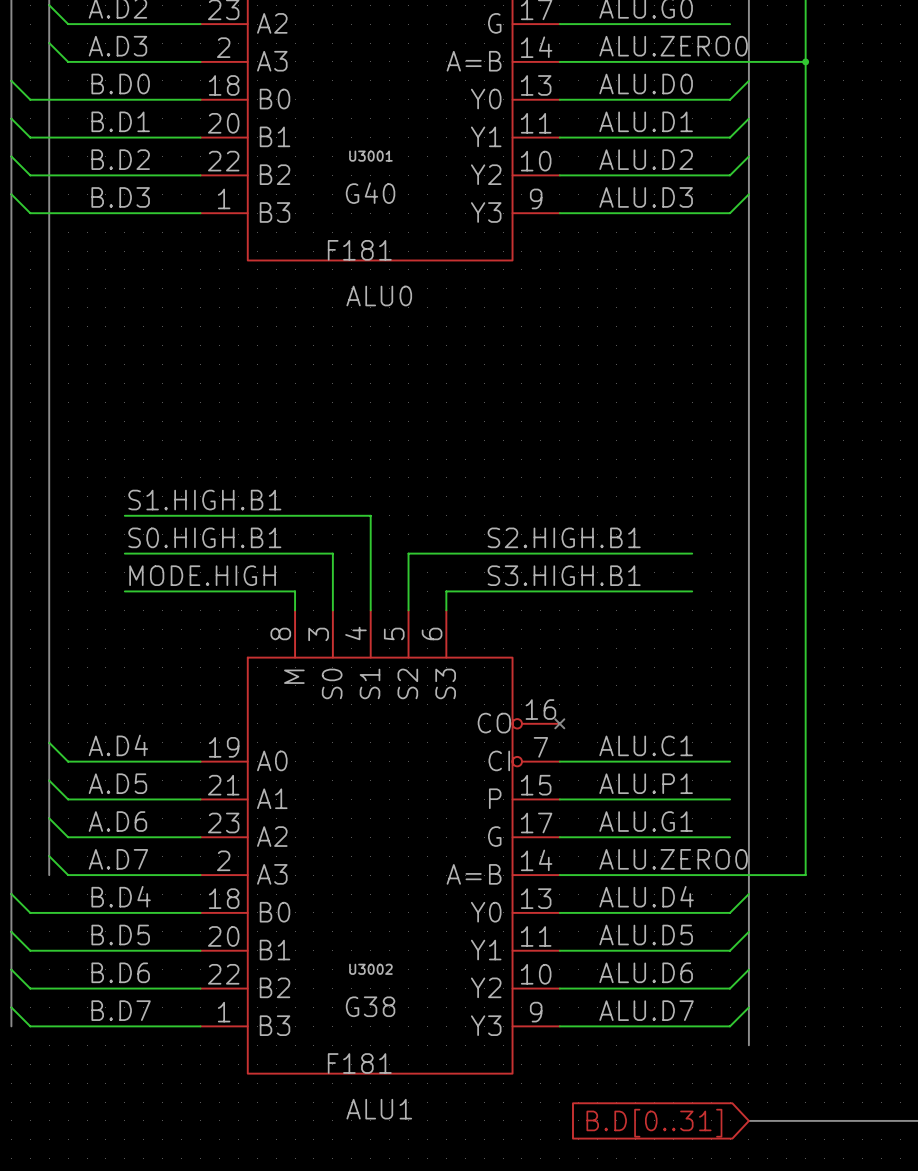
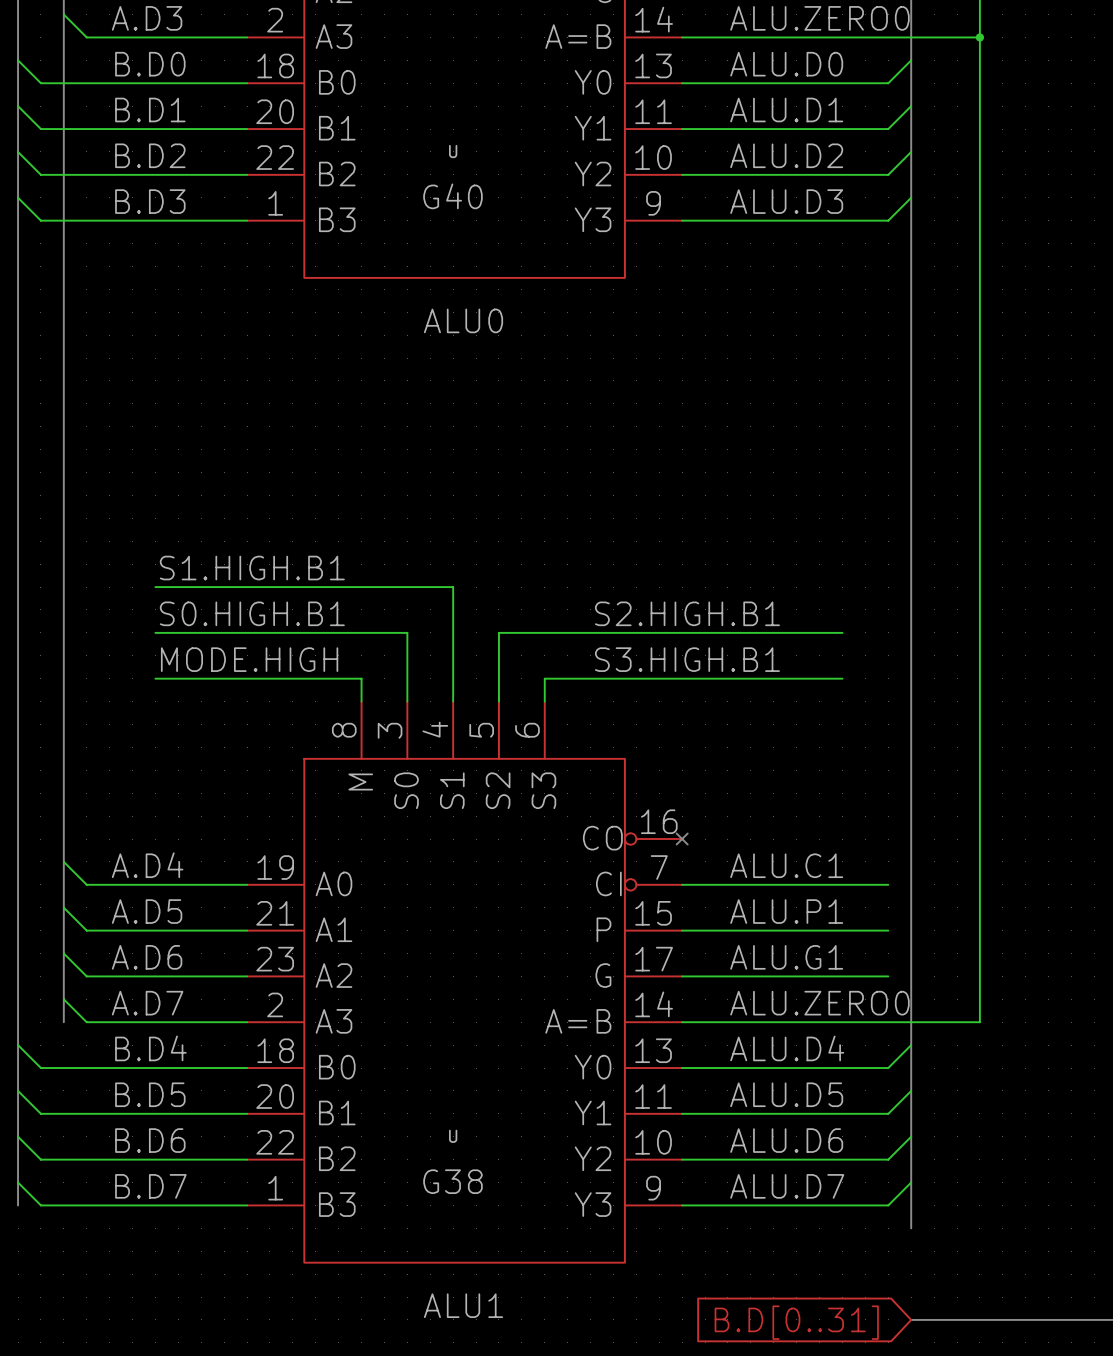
U3001 name: U3001 (370, 156) -> U (453, 151)
U3001 value: F181 (359, 250) -> none
U3002 name: U3002 (370, 969) -> U (453, 1136)
U3002 value: F181 (359, 1063) -> none

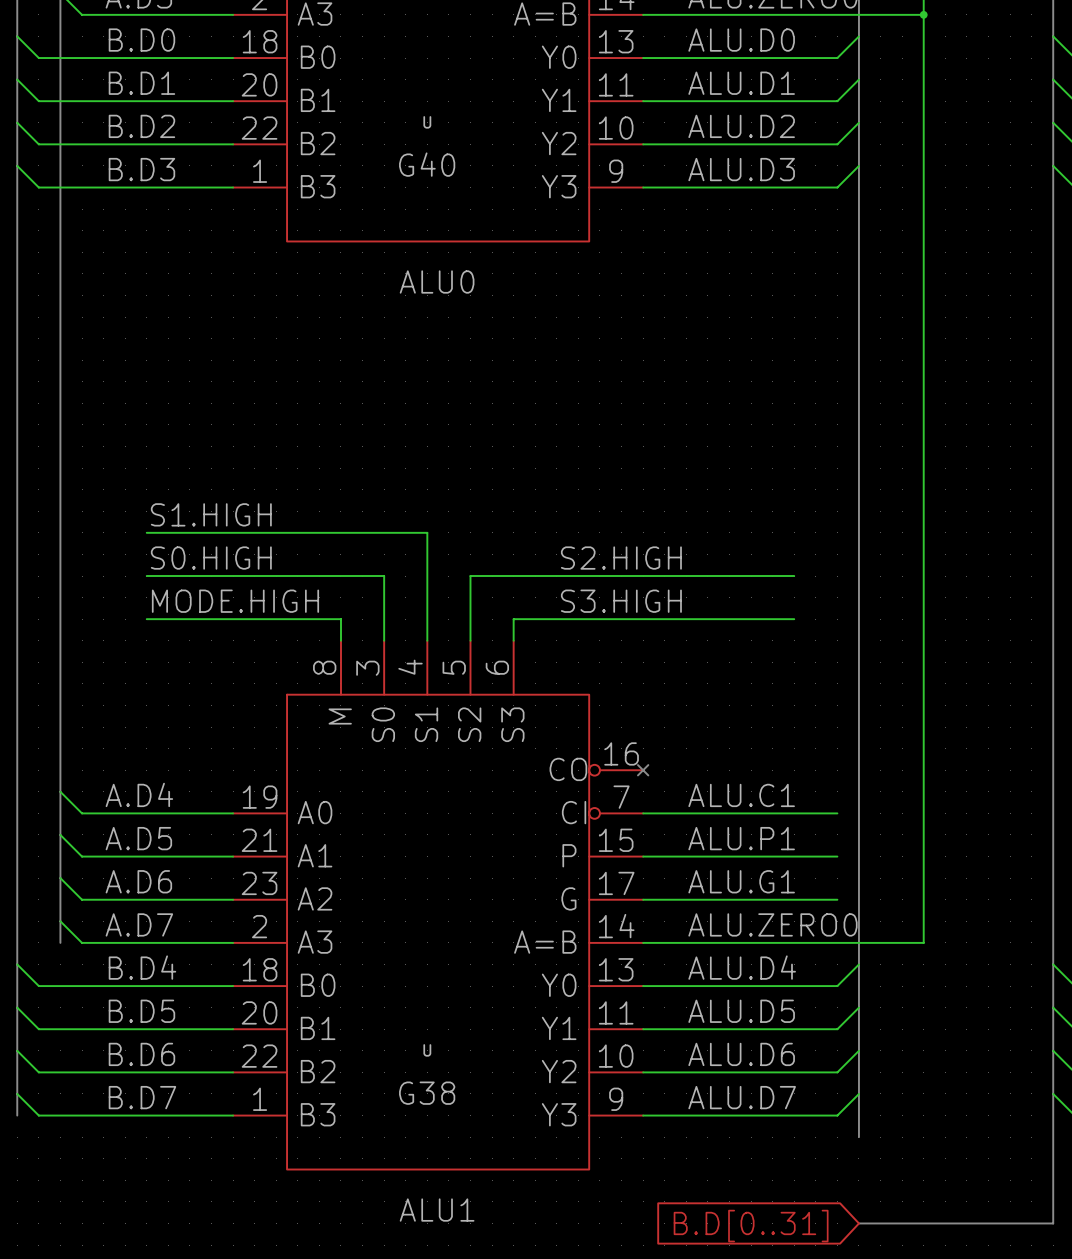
label: S1.HIGH.B1 (252, 568) -> S1.HIGH (211, 514)
label: S0.HIGH.B1 (252, 613) -> S0.HIGH (211, 558)
label: S2.HIGH.B1 (687, 613) -> S2.HIGH (621, 558)
label: S3.HIGH.B1 (687, 659) -> S3.HIGH (621, 601)

